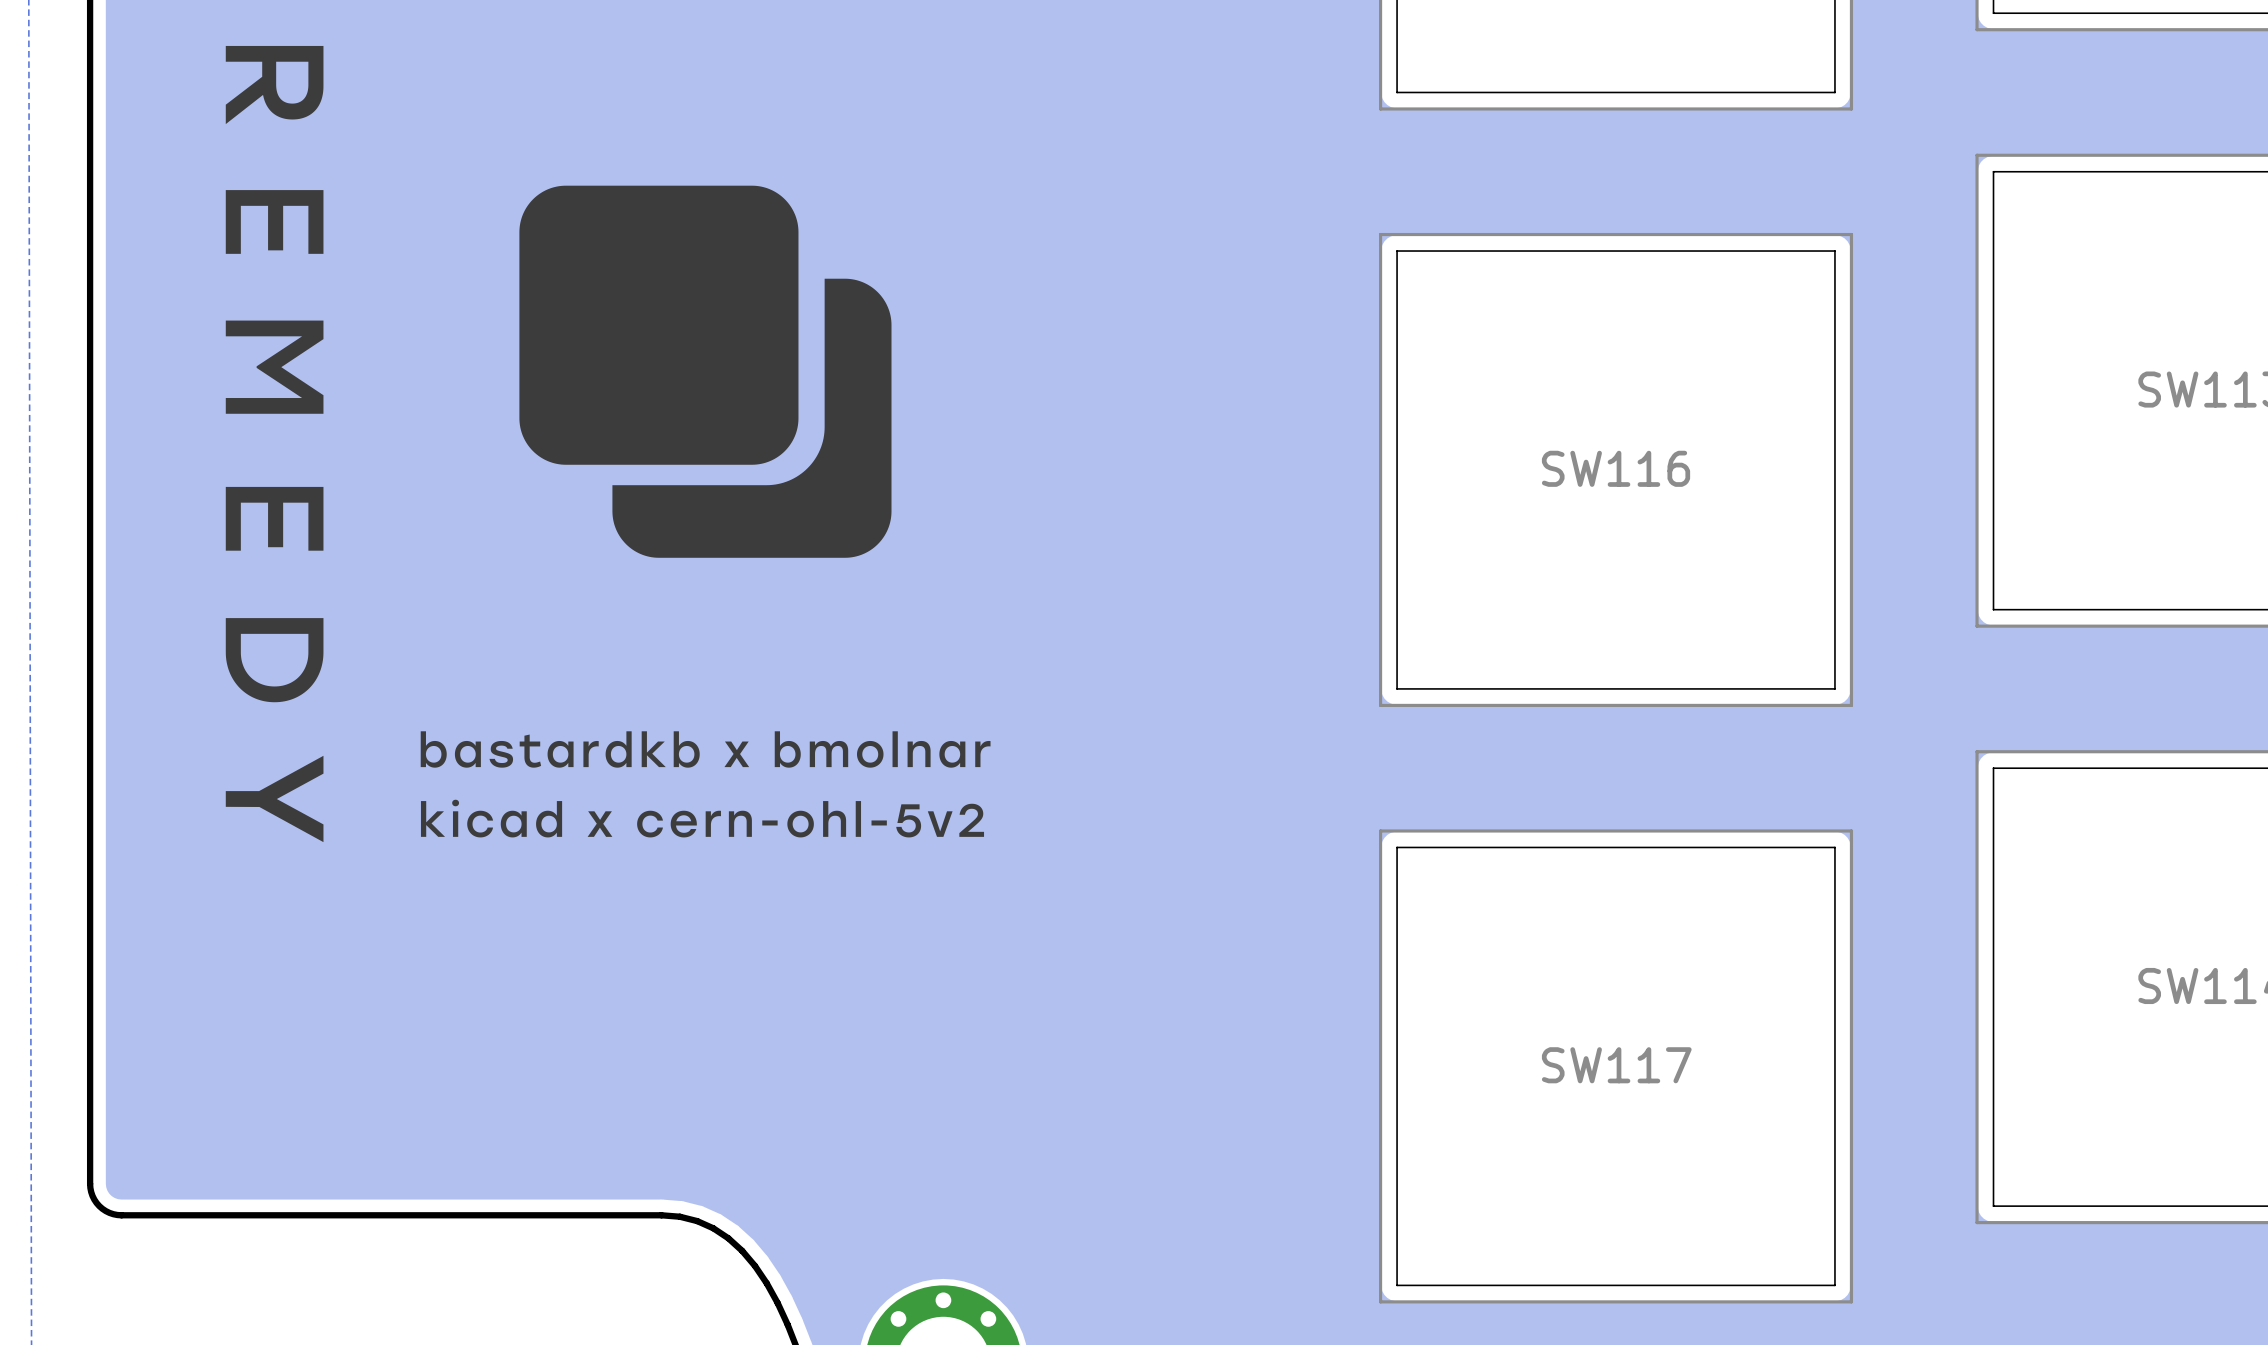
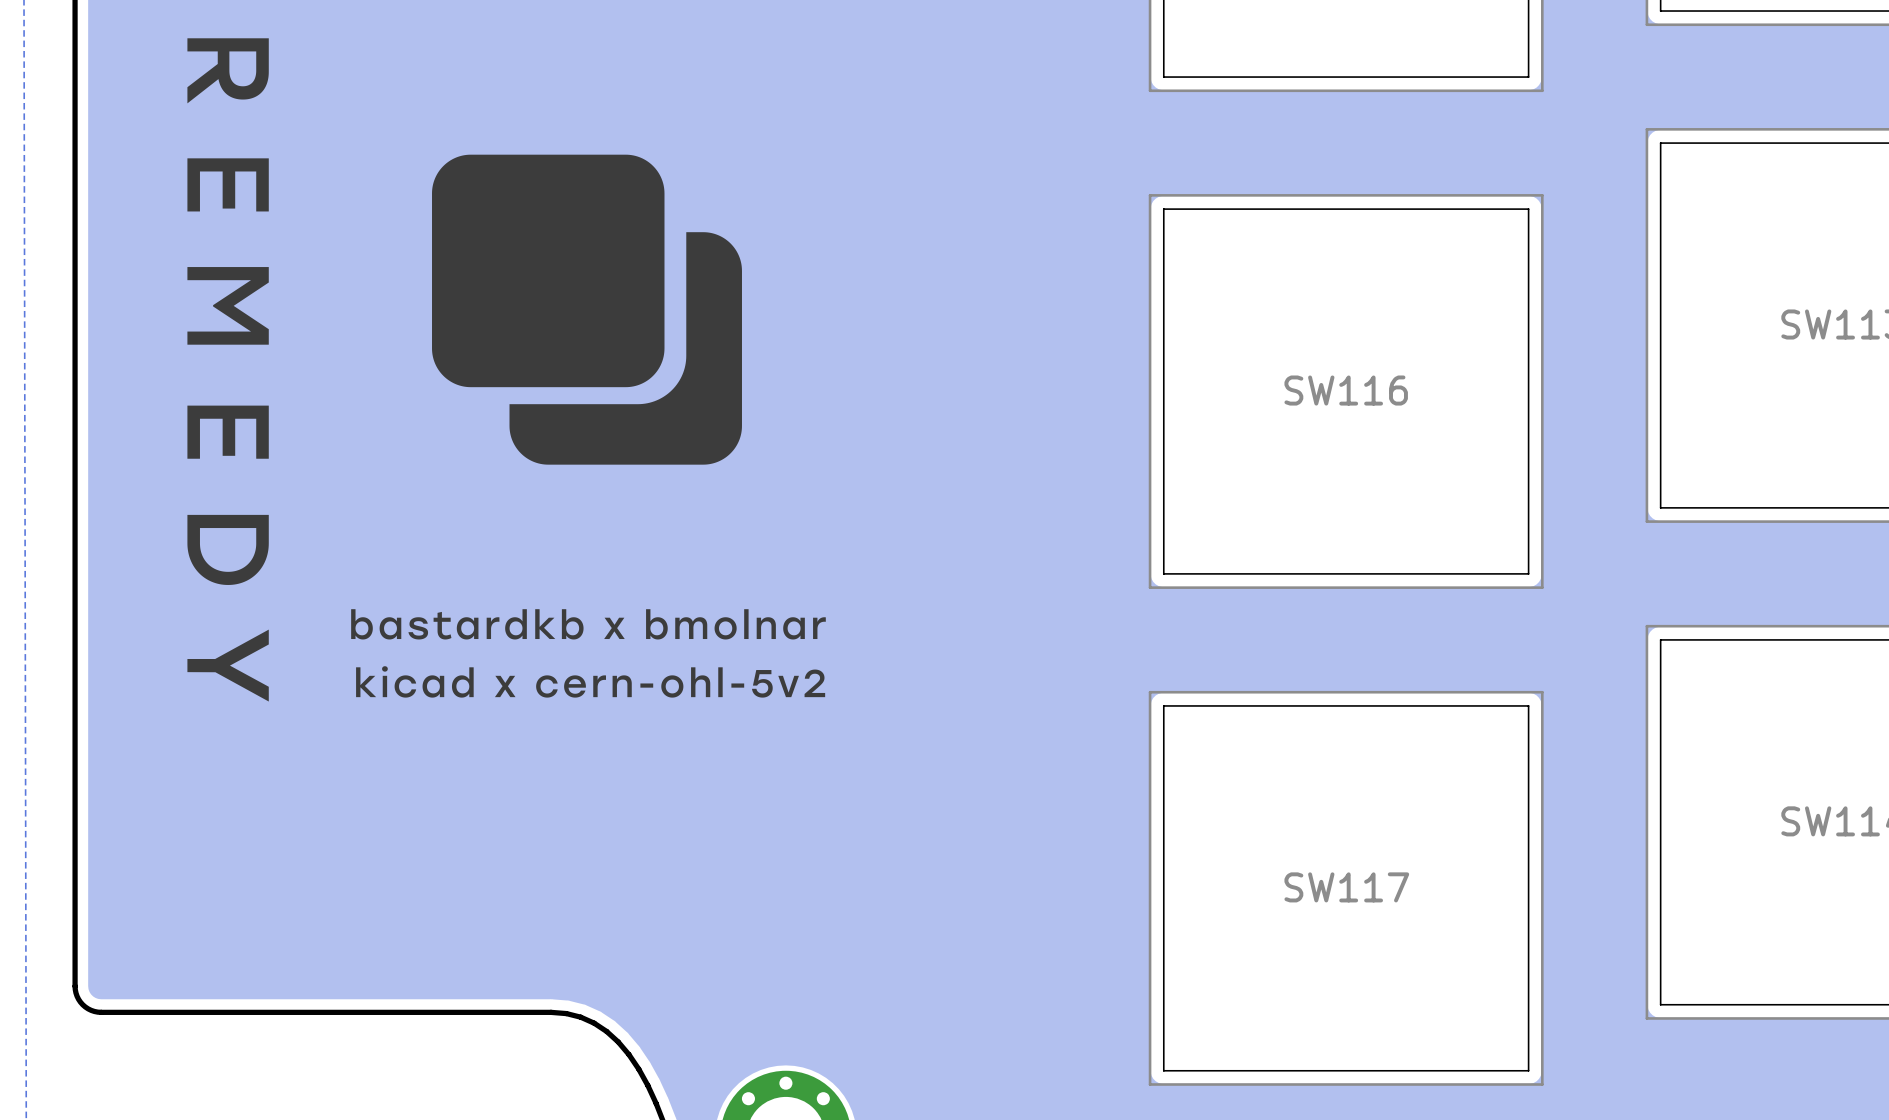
drawing shape: [225, 45, 991, 843] -> [187, 38, 826, 702]

